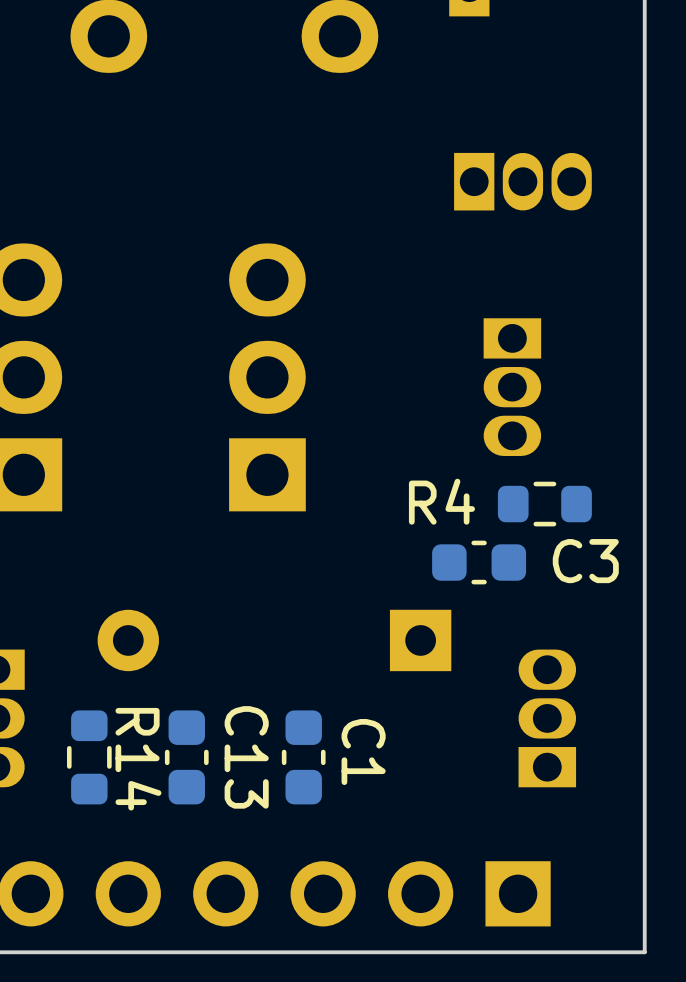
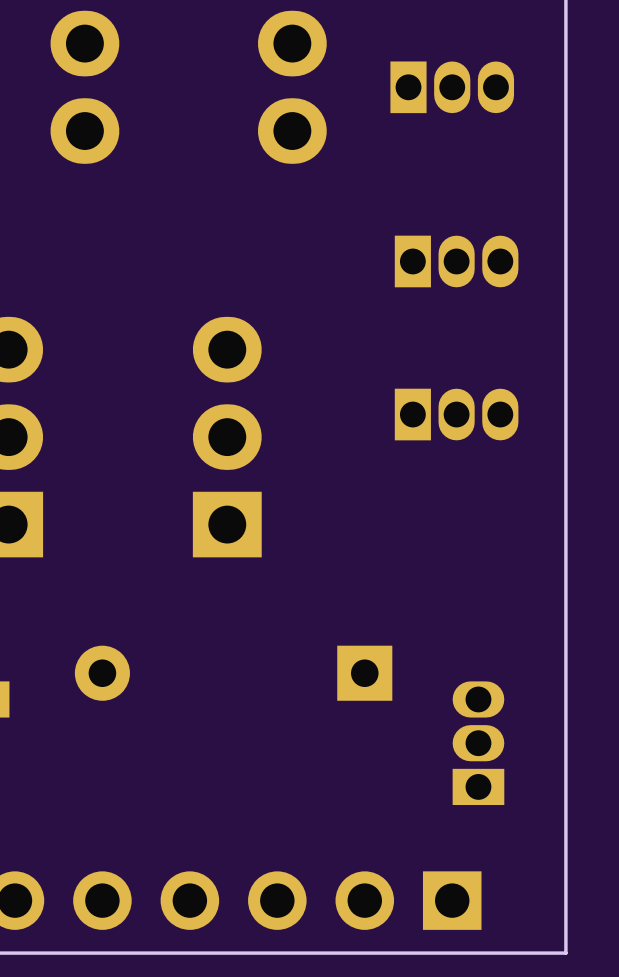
part rotation: 0° (512, 387) -> 90° counterclockwise (456, 414)
R4: (544, 504) -> none
C3: (479, 562) -> none
R14: (89, 757) -> none
C13: (186, 757) -> none
C1: (303, 757) -> none

